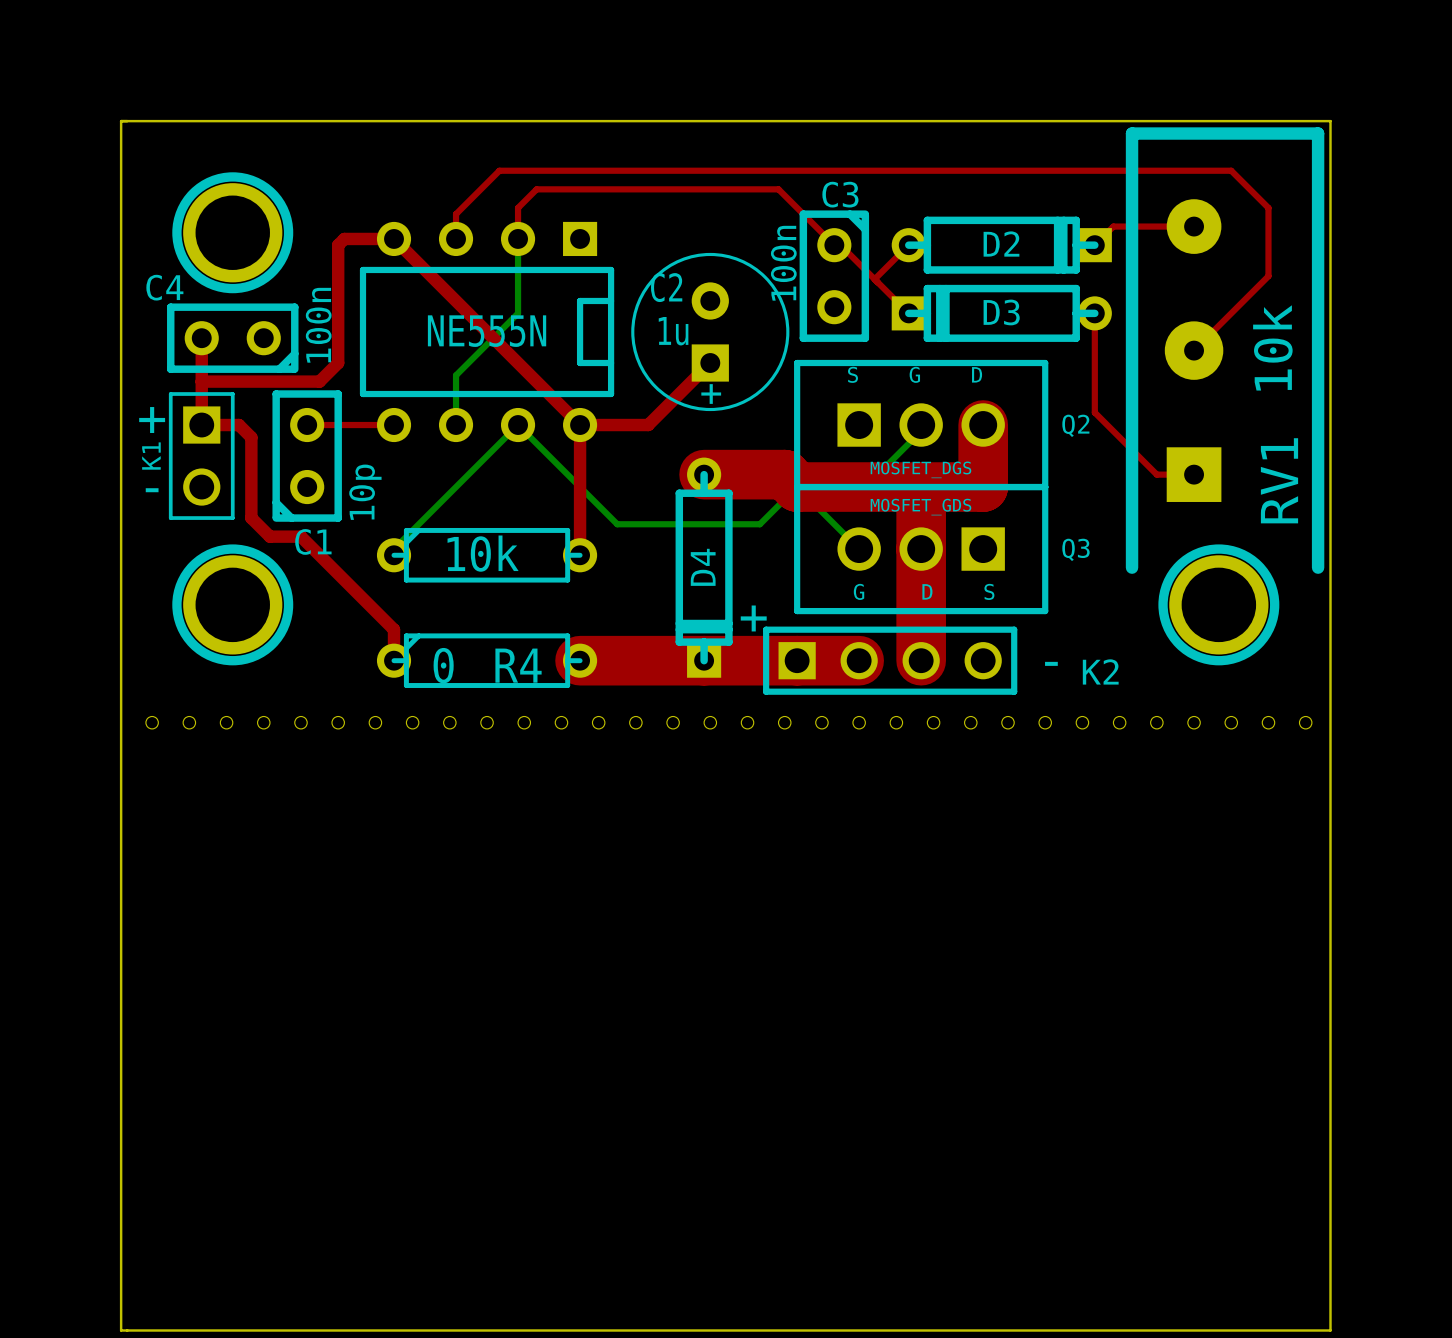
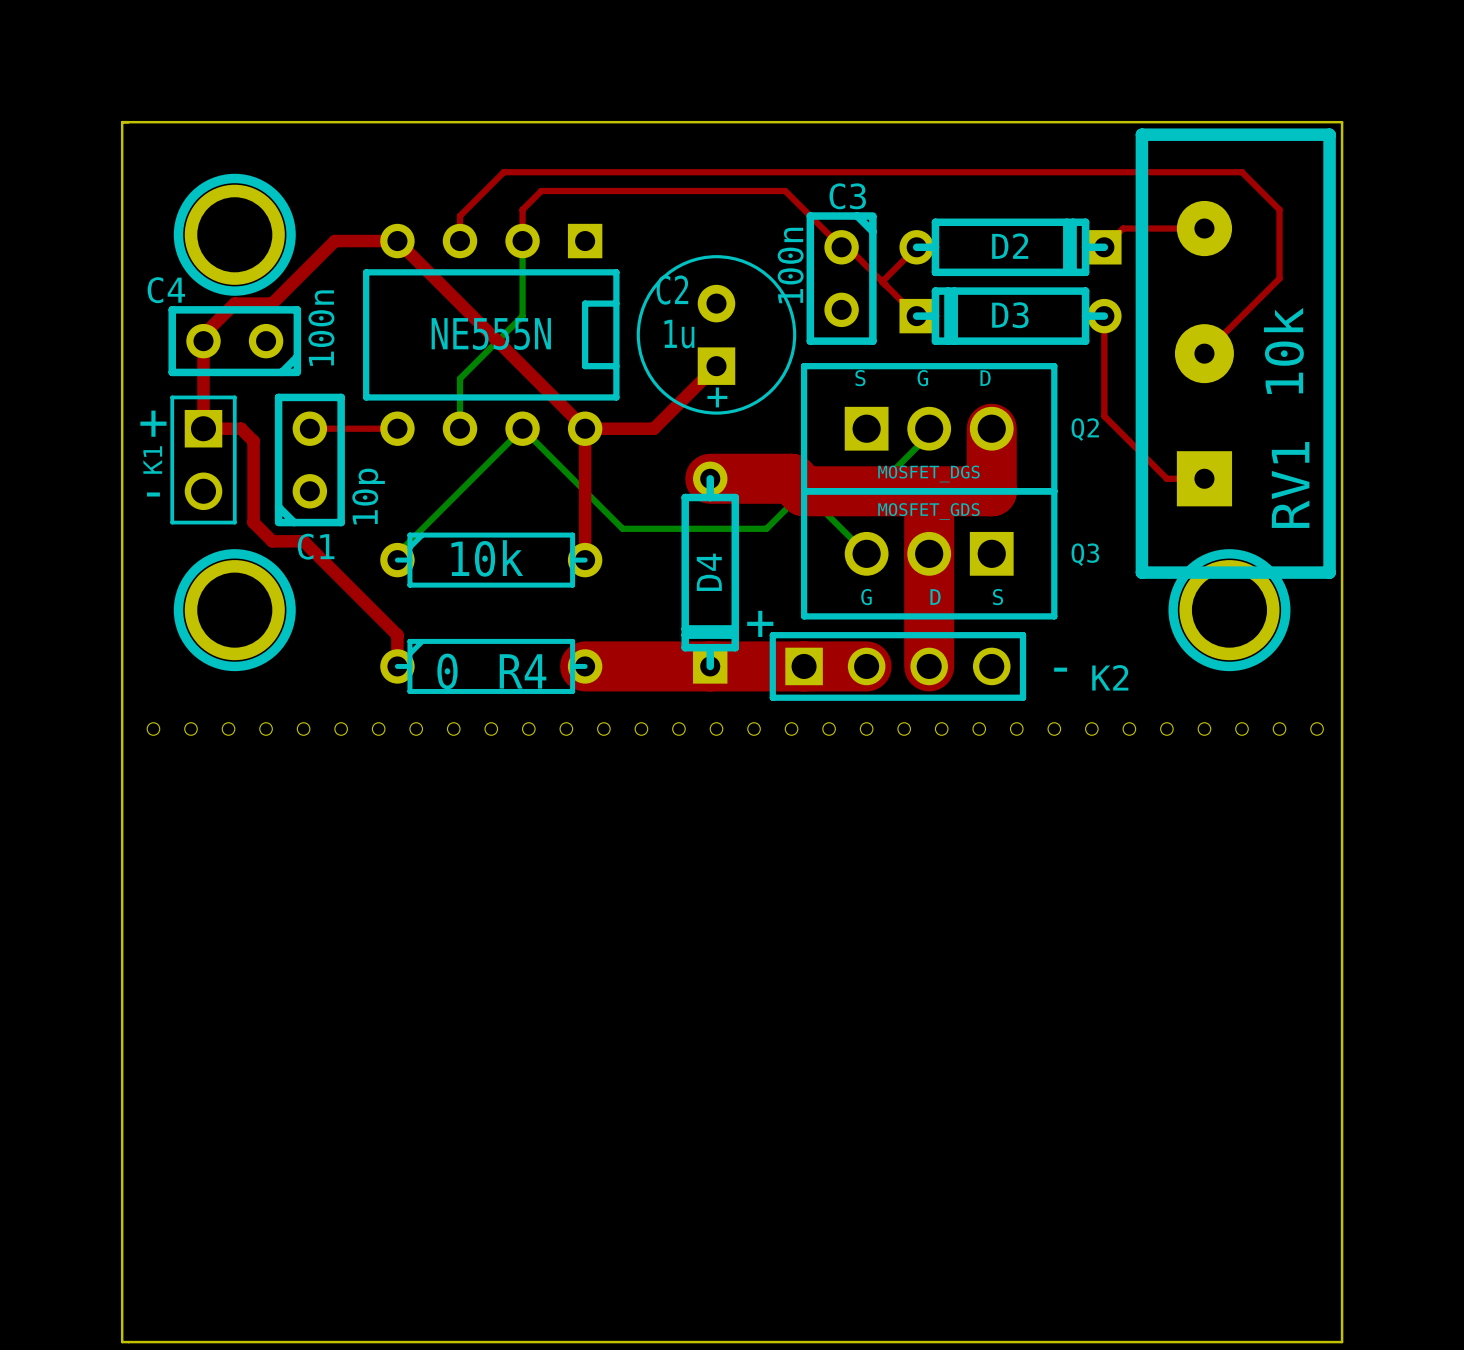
RV1 footprint: [1125, 127, 1325, 574] -> [1135, 128, 1336, 579]
top track: (344, 238) (338, 245) (338, 363) (319, 381) (201, 381) -> (347, 241) (334, 241) (272, 303) (234, 303) (203, 334) (203, 341)

